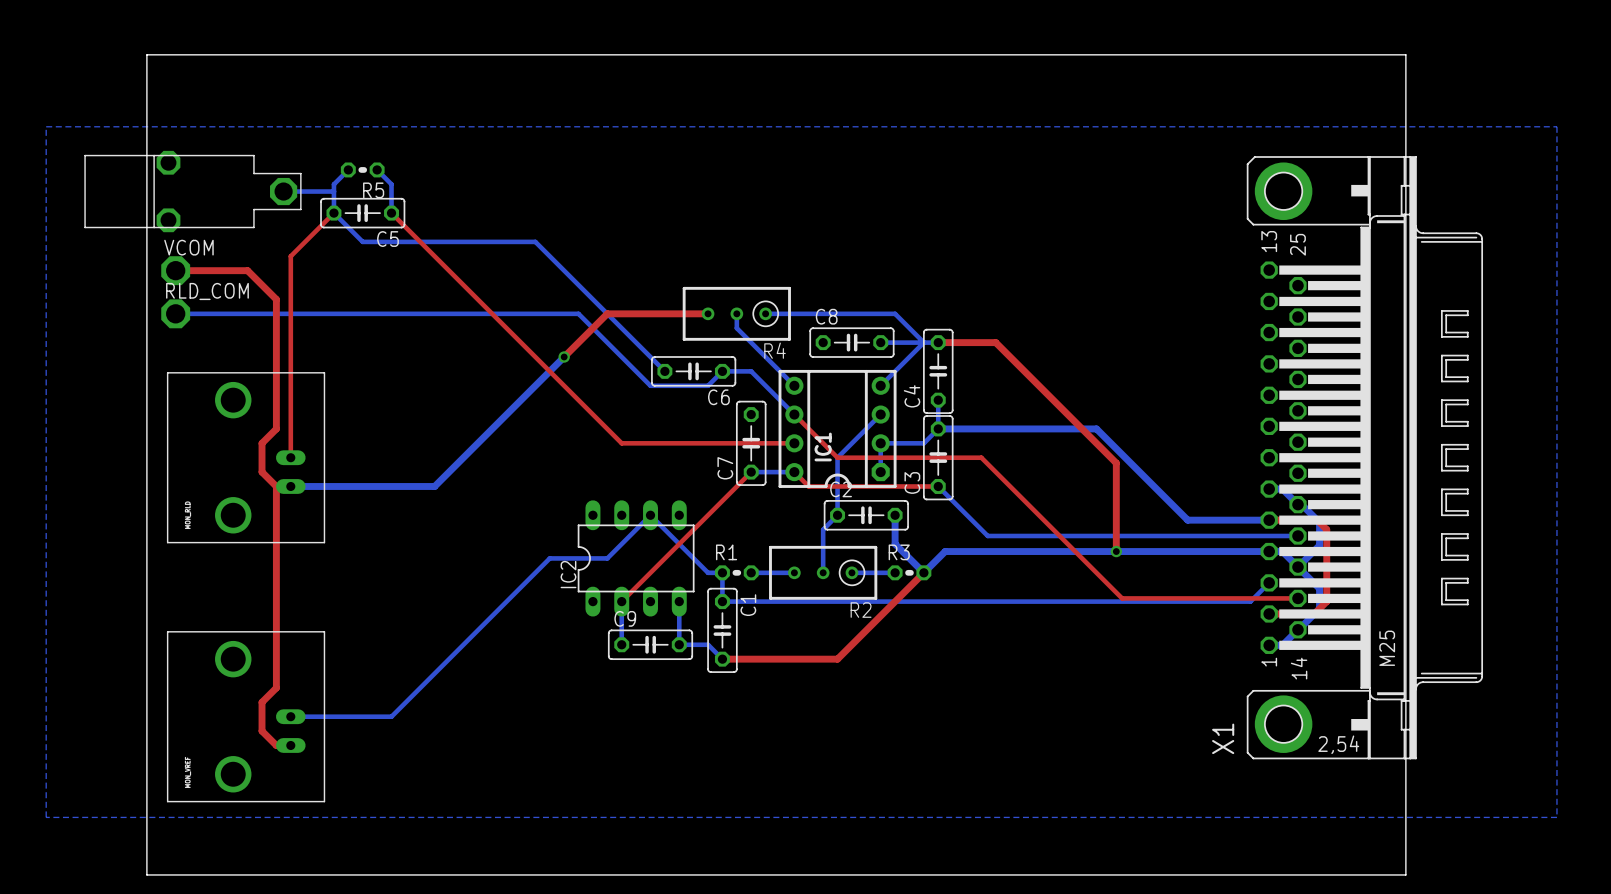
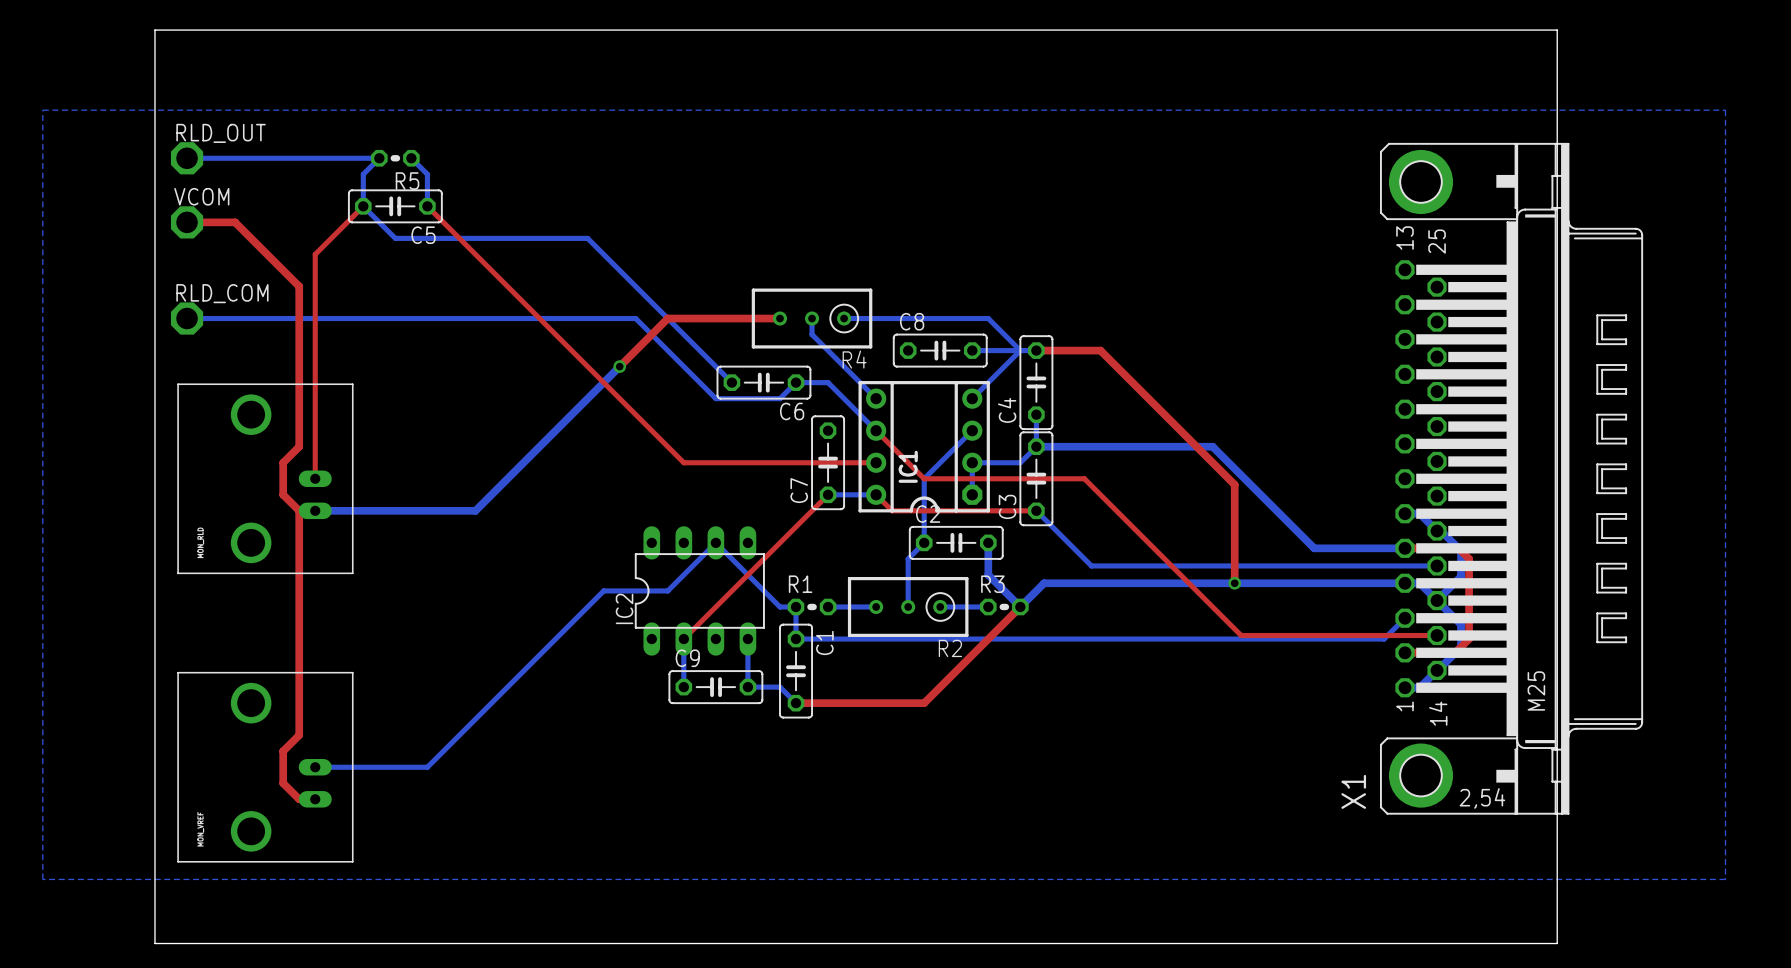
bottom track: none -> (187, 158) (379, 158)
RLD_OUT: none -> (187, 158)
part: (192, 191) -> none
bottom track: (283, 191) (333, 191) -> none
top track: (175, 270) (247, 270) (276, 299) -> (187, 222) (235, 222) (299, 286) (299, 302)
VCOM position: (175, 270) -> (187, 222)

